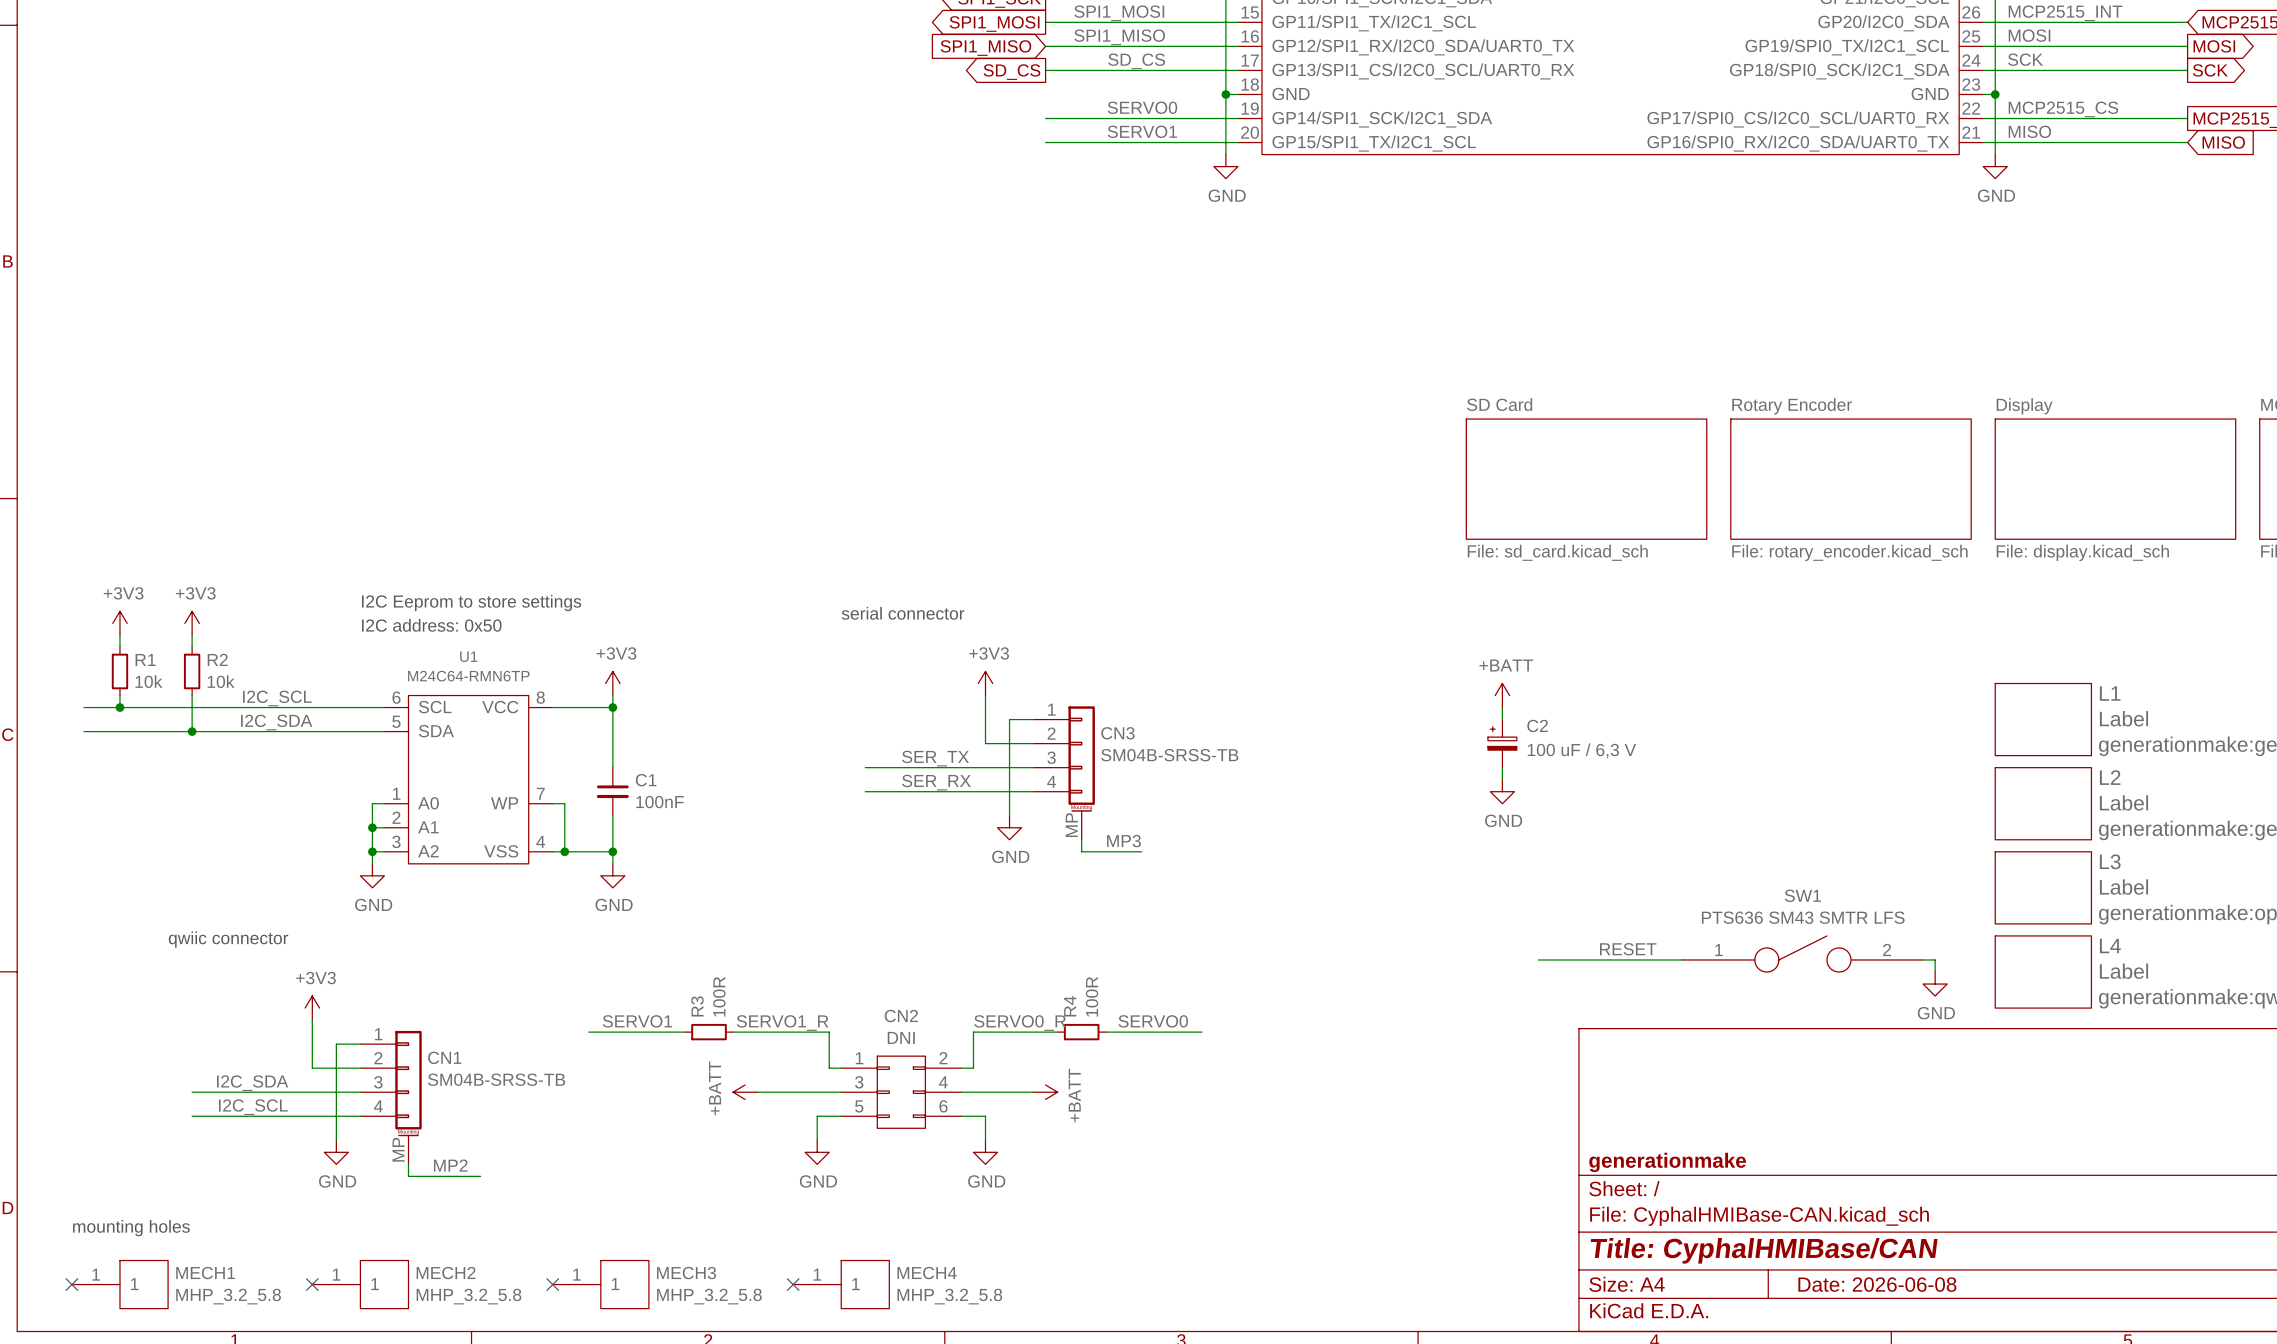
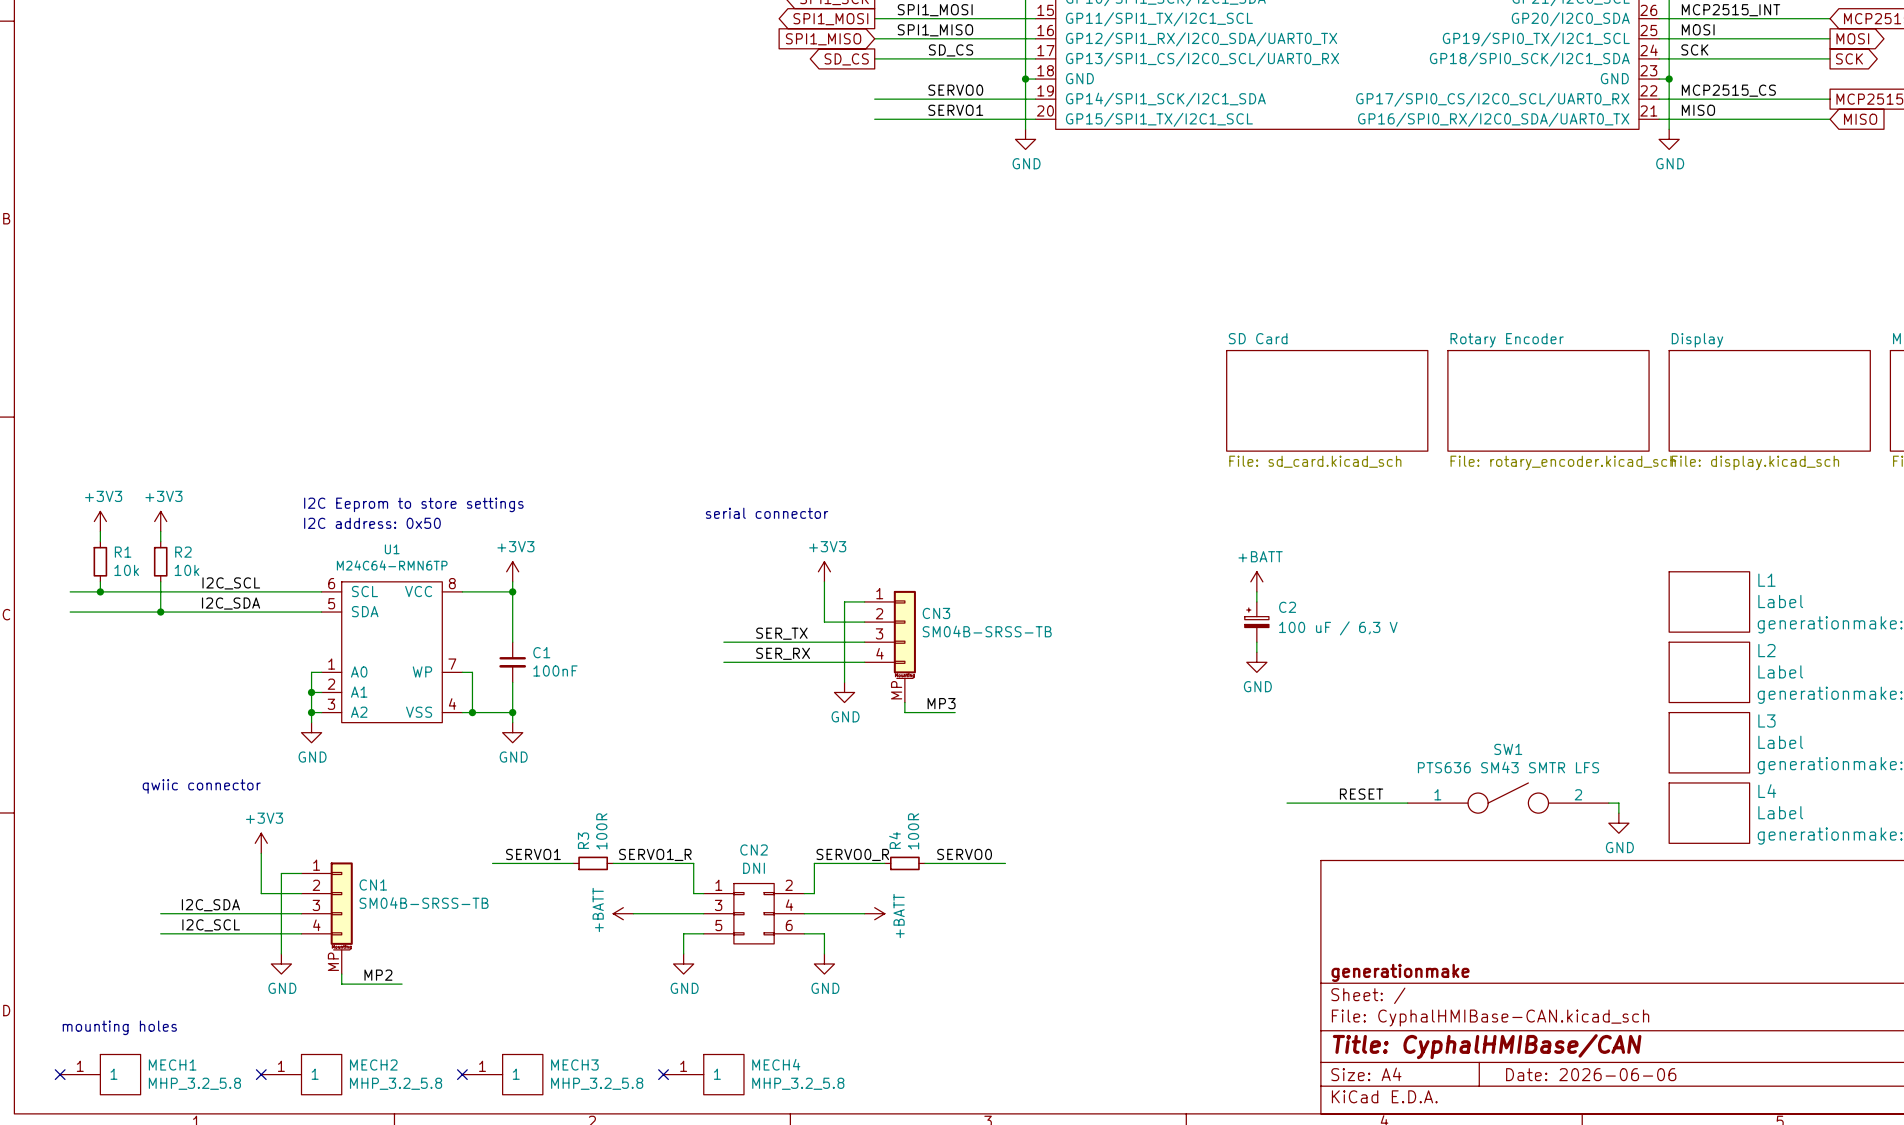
title block: Date: 2026-06-08 (1877, 1284) -> Date: 2026-06-06 (1591, 1074)

